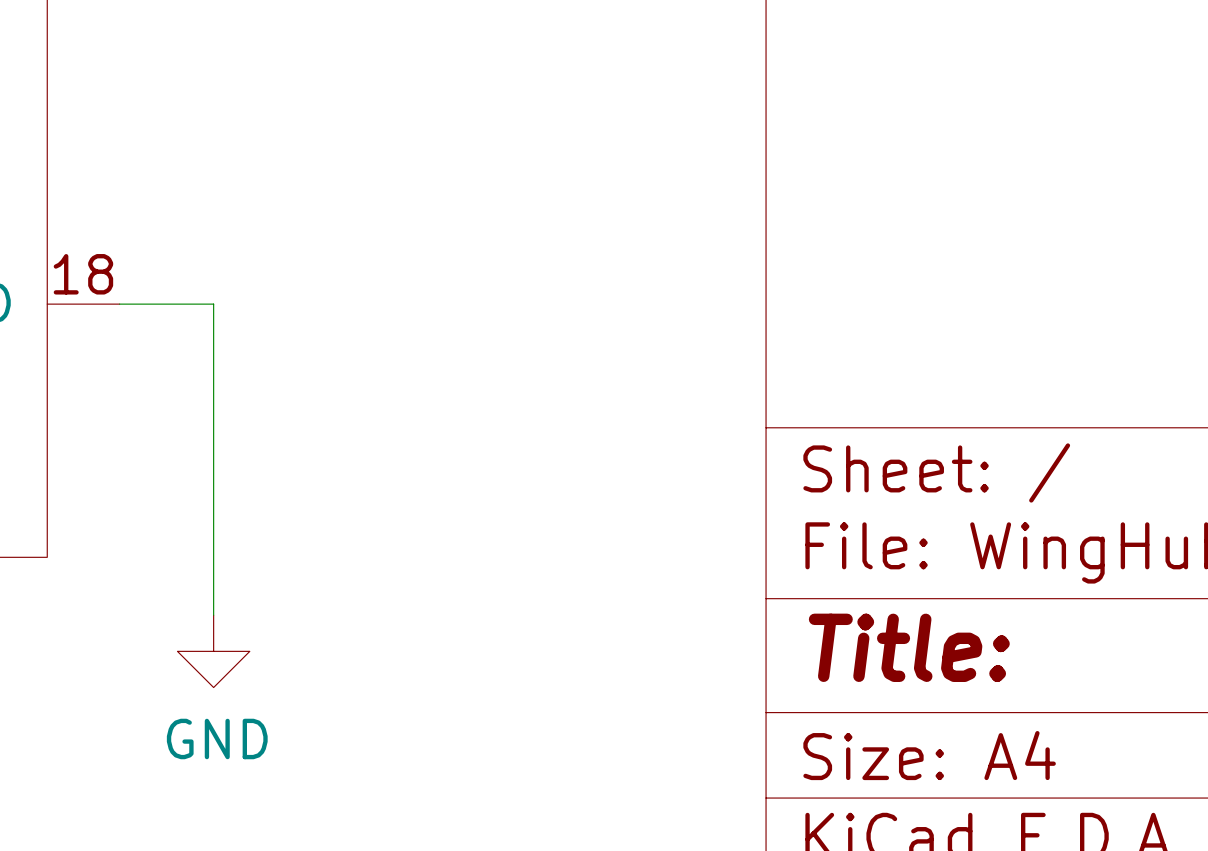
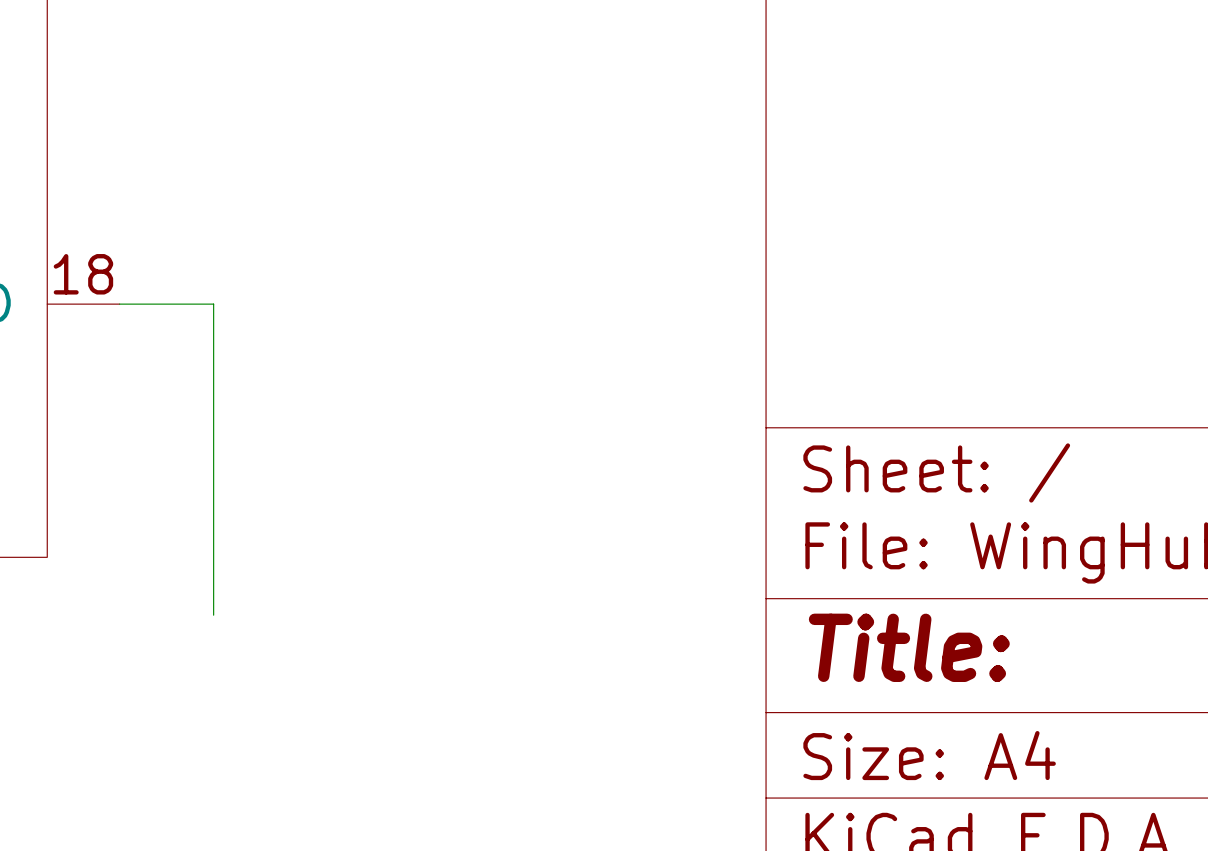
power symbol: GND (213, 651) -> none

